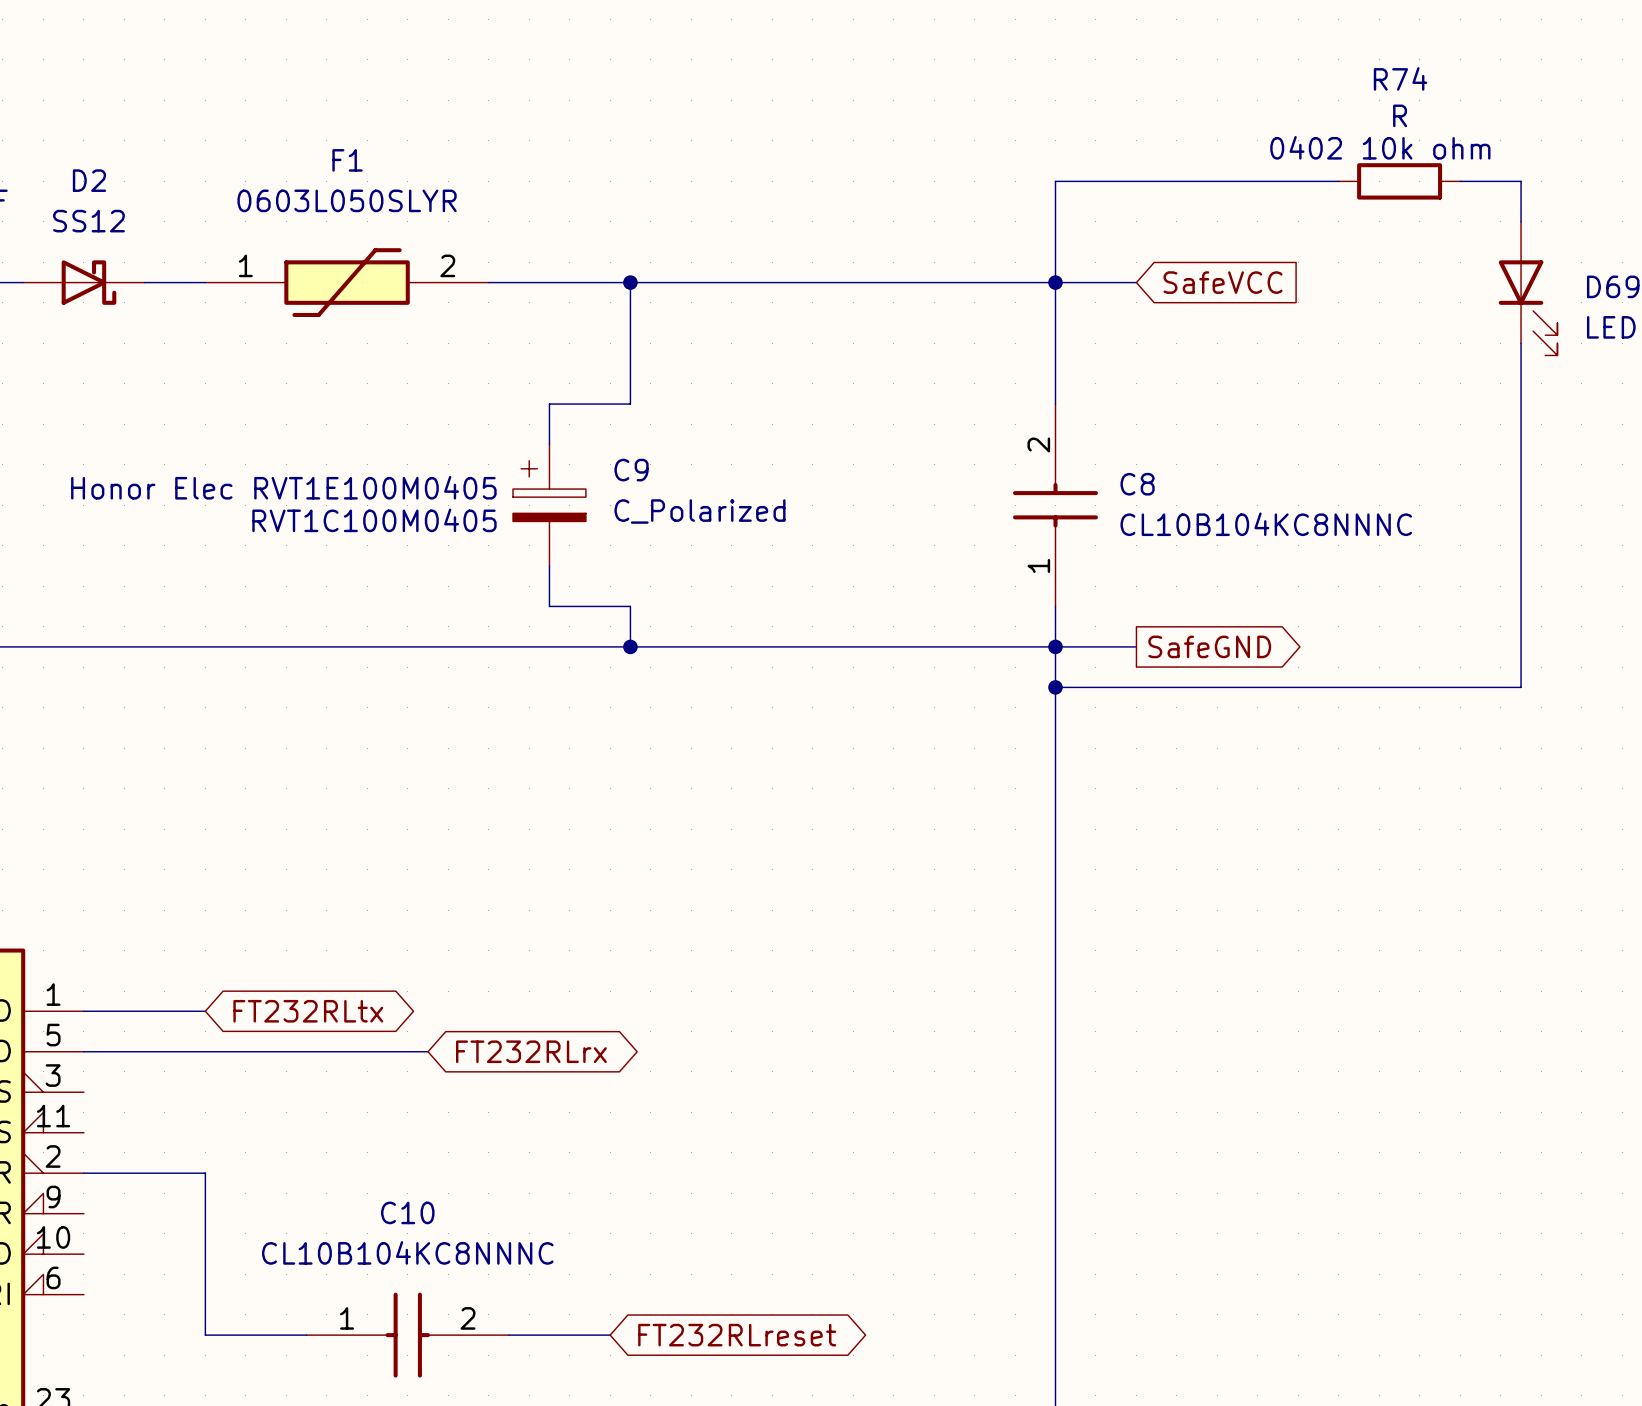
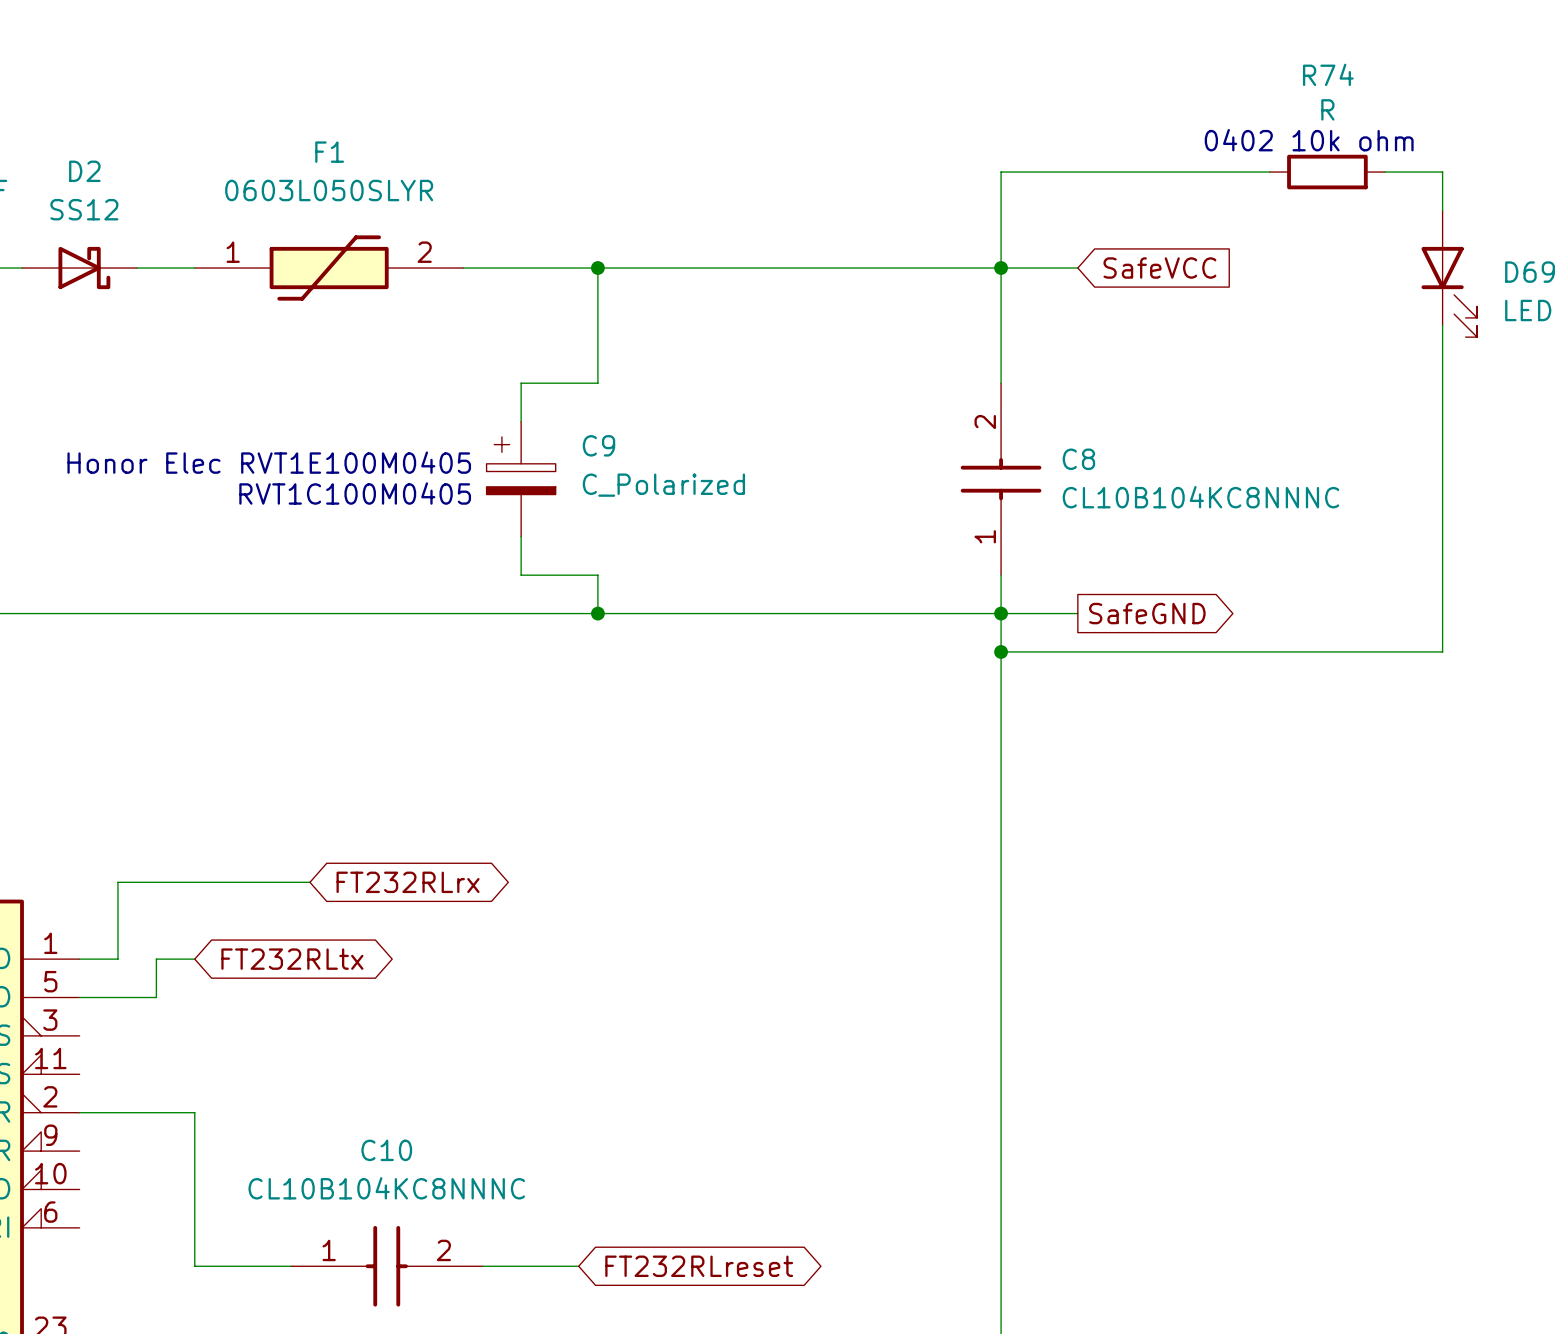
wire: none -> (309, 882) (117, 882) (117, 959)
wire: (124, 1011) (164, 1011) -> (156, 997) (156, 959)
wire: (164, 1051) (428, 1051) -> none
global label position: FT232RLrx (531, 1051) -> FT232RLrx (408, 882)

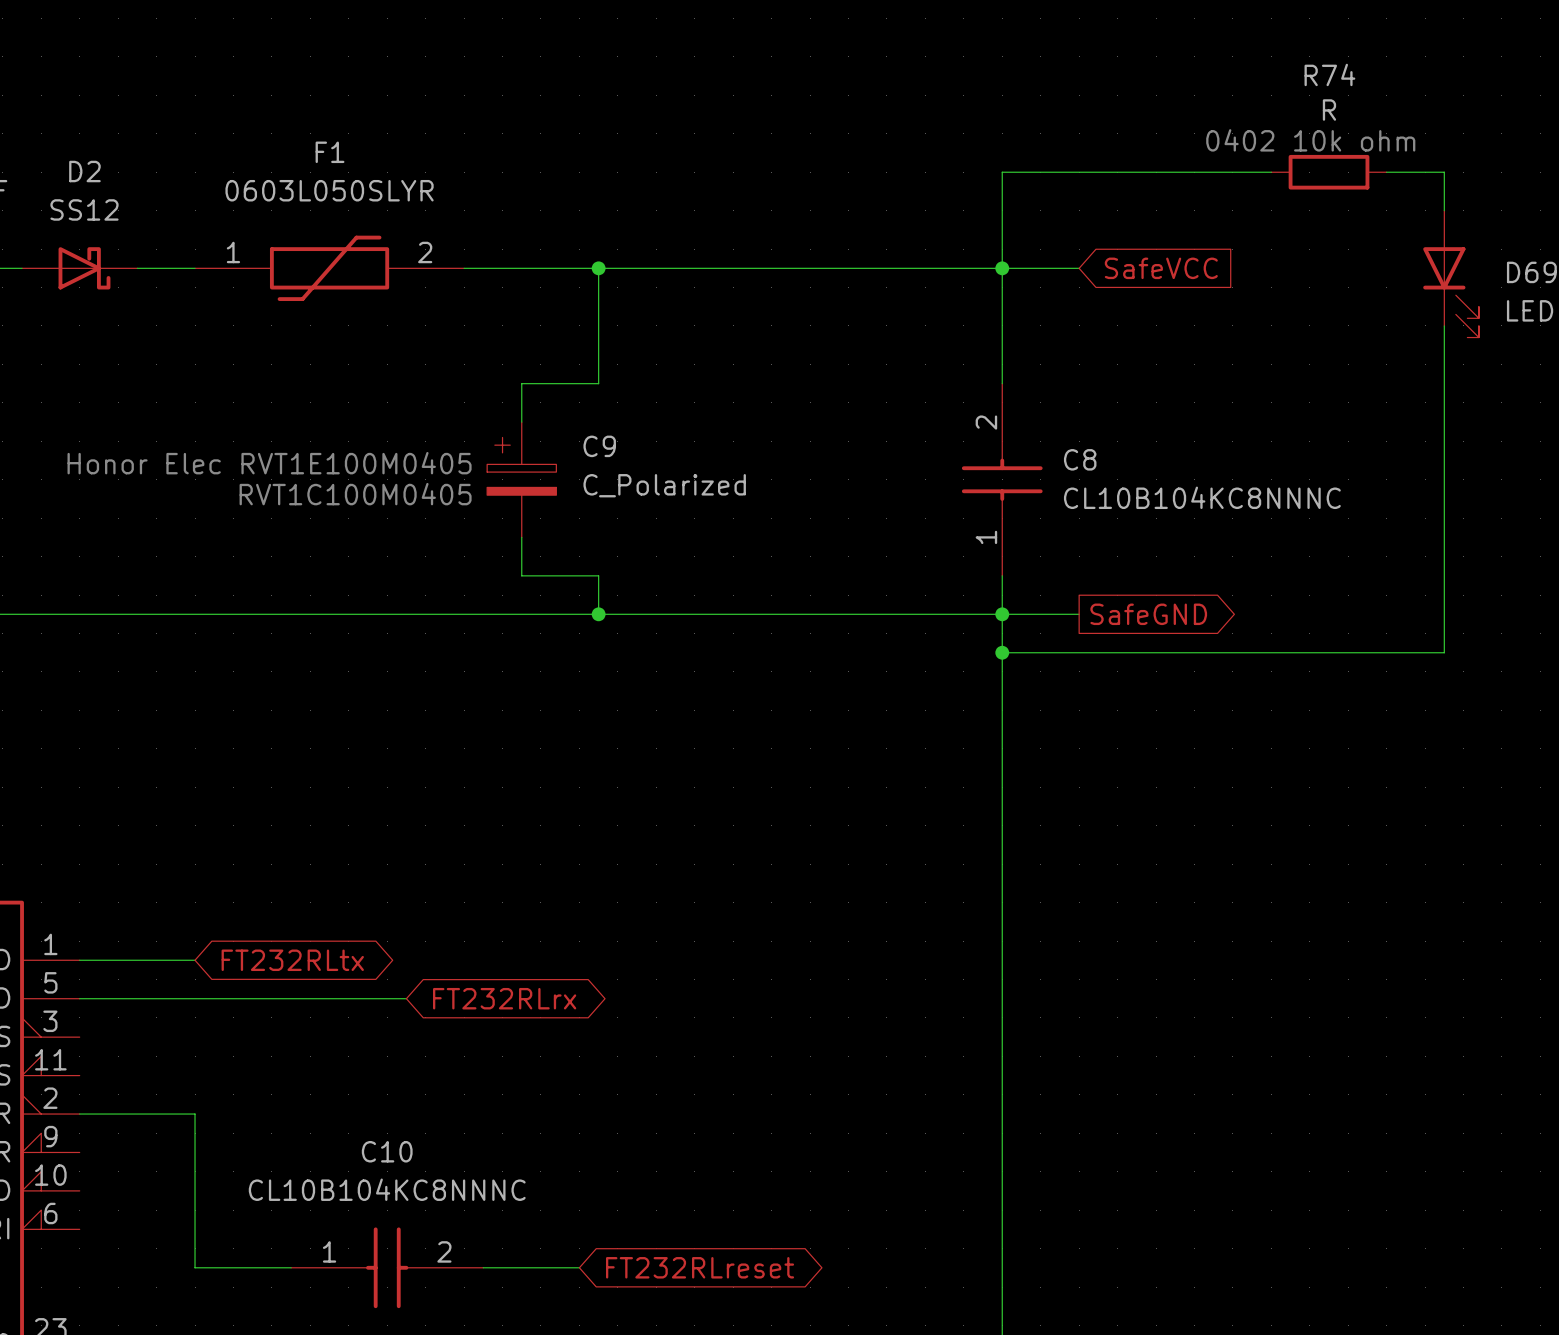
wire: (309, 882) (117, 882) (117, 959) -> none
global label position: FT232RLrx (408, 882) -> FT232RLrx (504, 998)
wire: (156, 959) (156, 997) -> (156, 960) (118, 960)
wire: none -> (156, 998) (406, 998)

